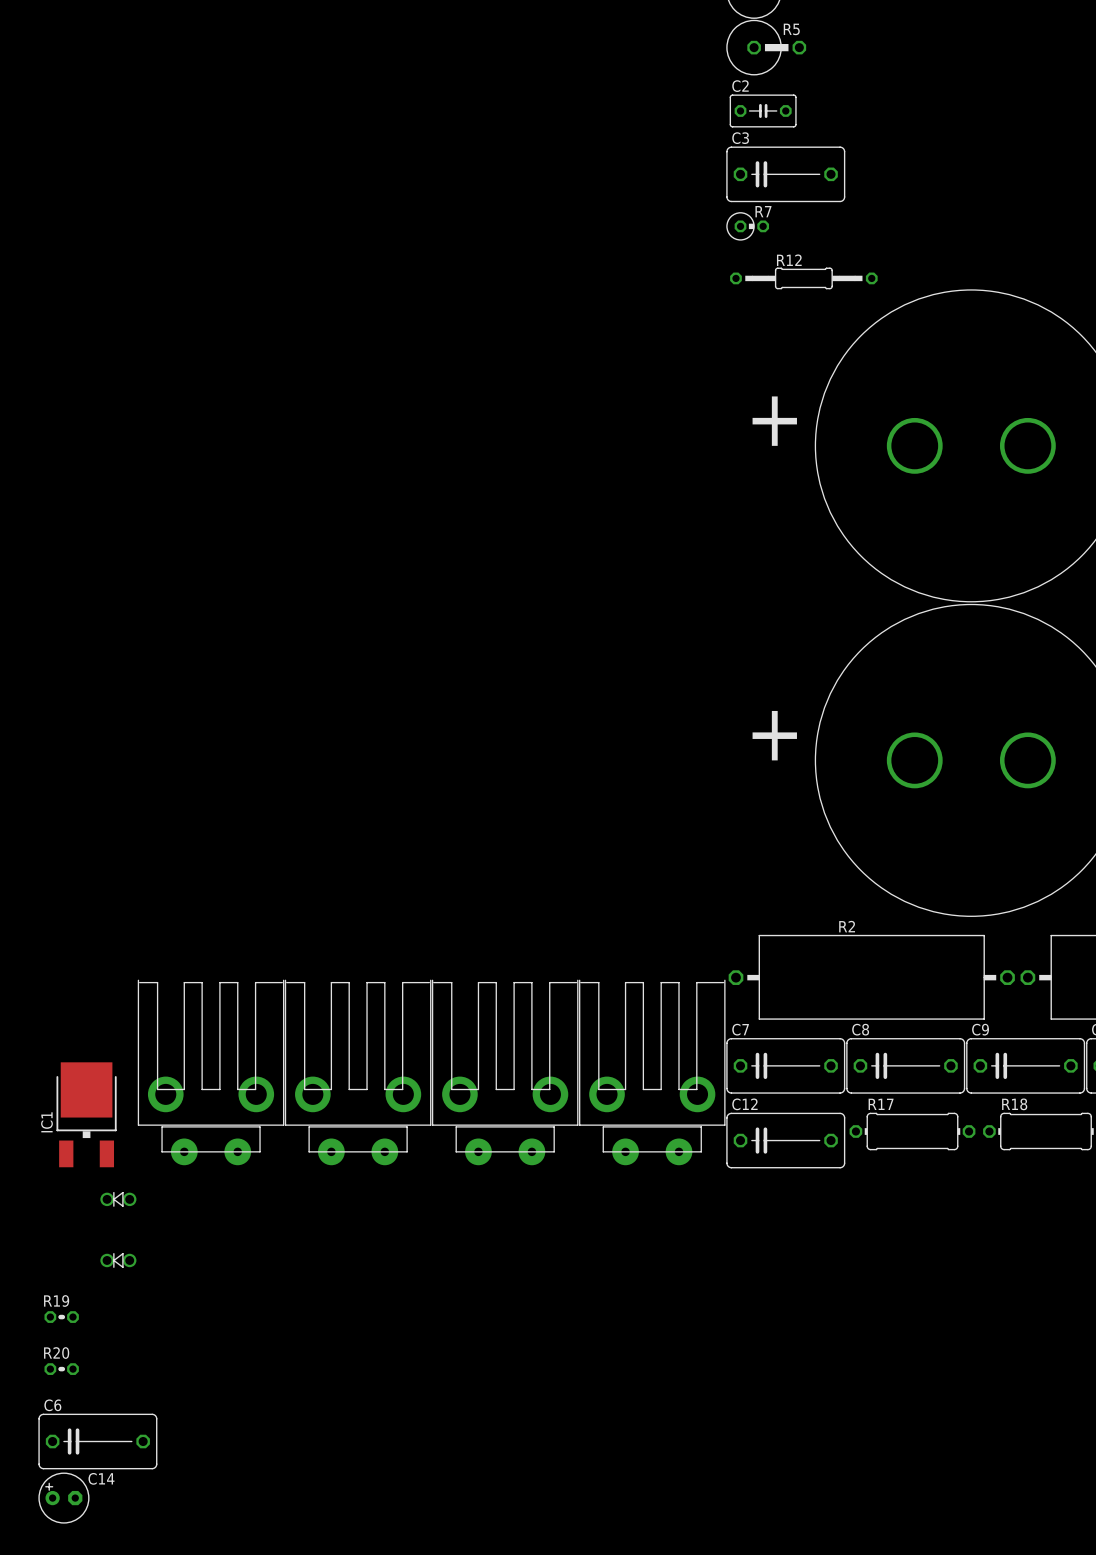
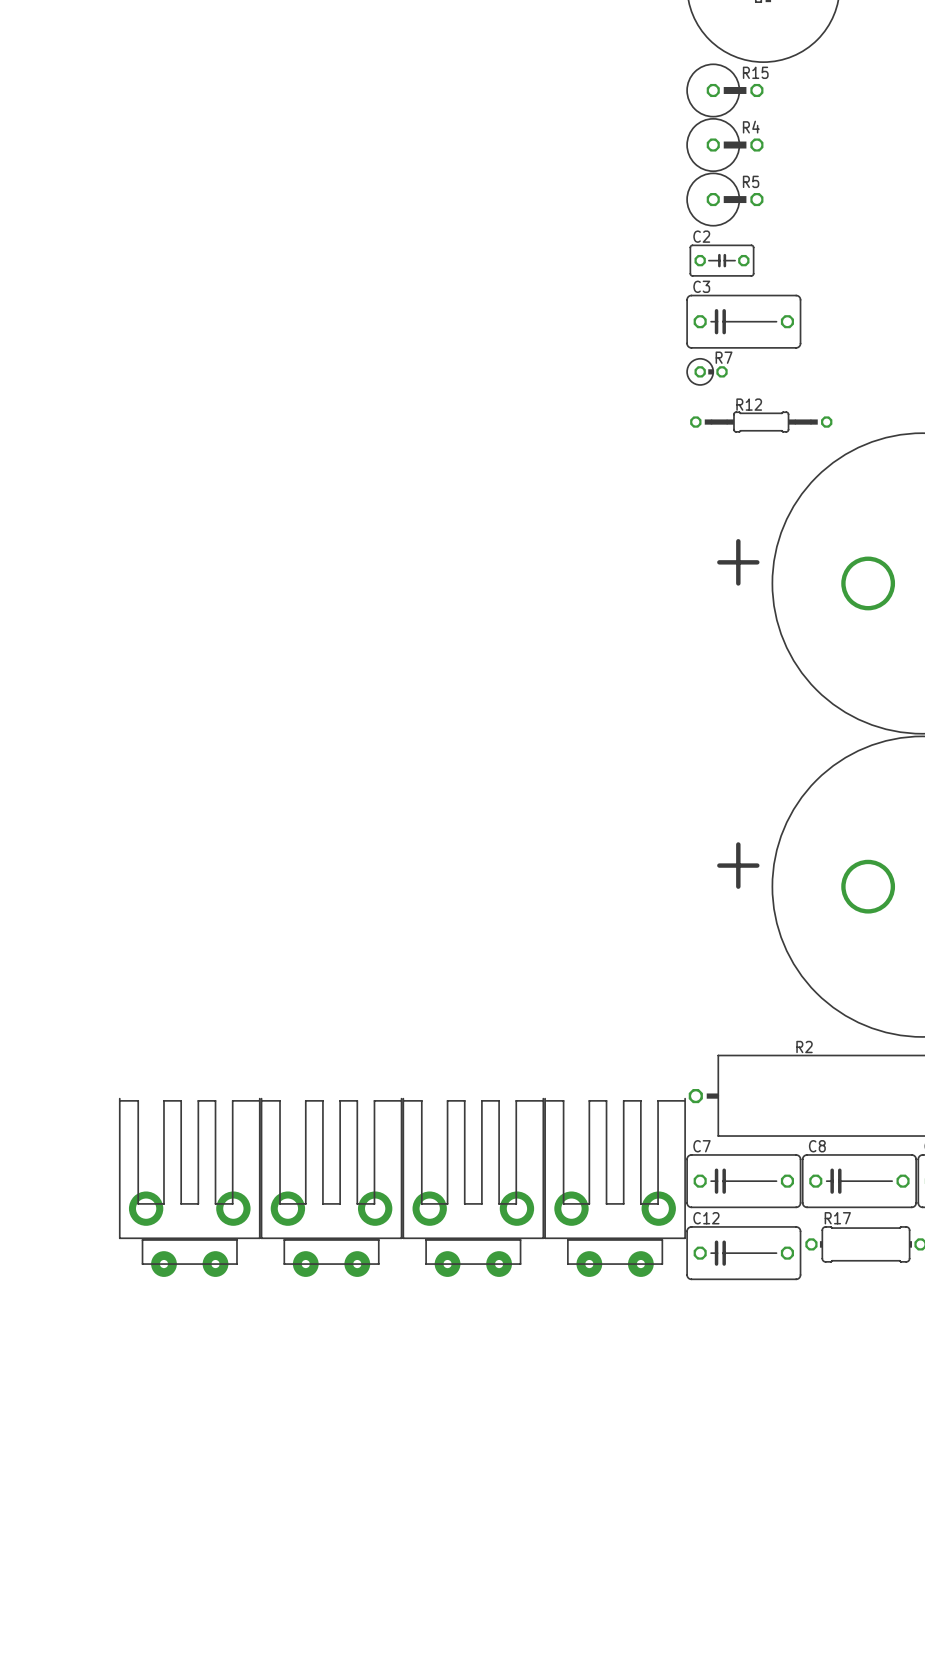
IC1: (86, 1114) -> none
part: (118, 1199) -> none
part: (118, 1260) -> none
R19: (61, 1317) -> none
R20: (61, 1369) -> none
C6: (97, 1441) -> none
C14: (63, 1498) -> none

